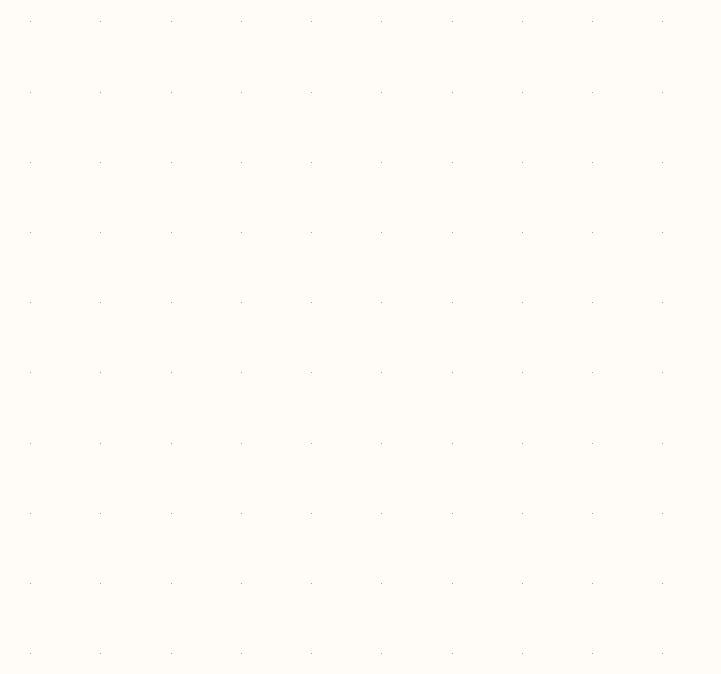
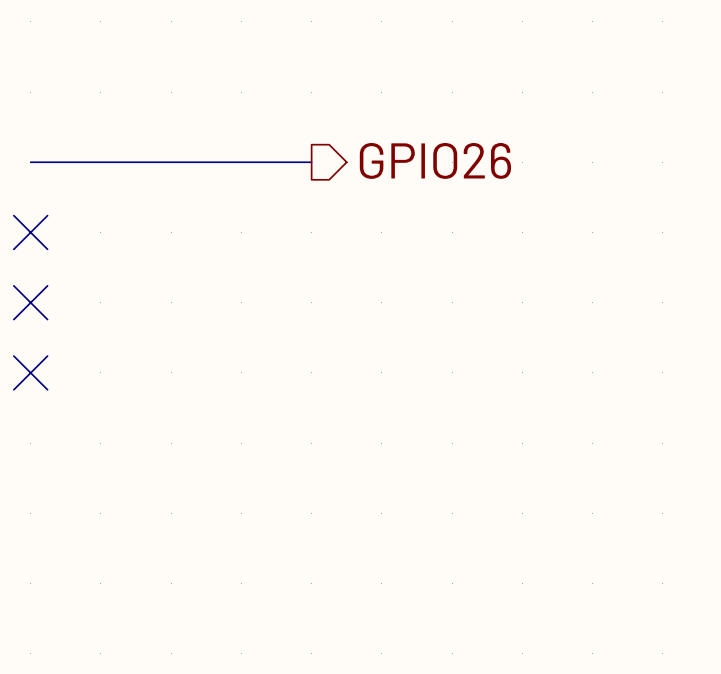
hierarchical label: none -> GPIO26 (435, 160)
wire: none -> (30, 162) (311, 162)
no-connect mark: none -> (30, 232)
no-connect mark: none -> (30, 302)
no-connect mark: none -> (30, 372)

